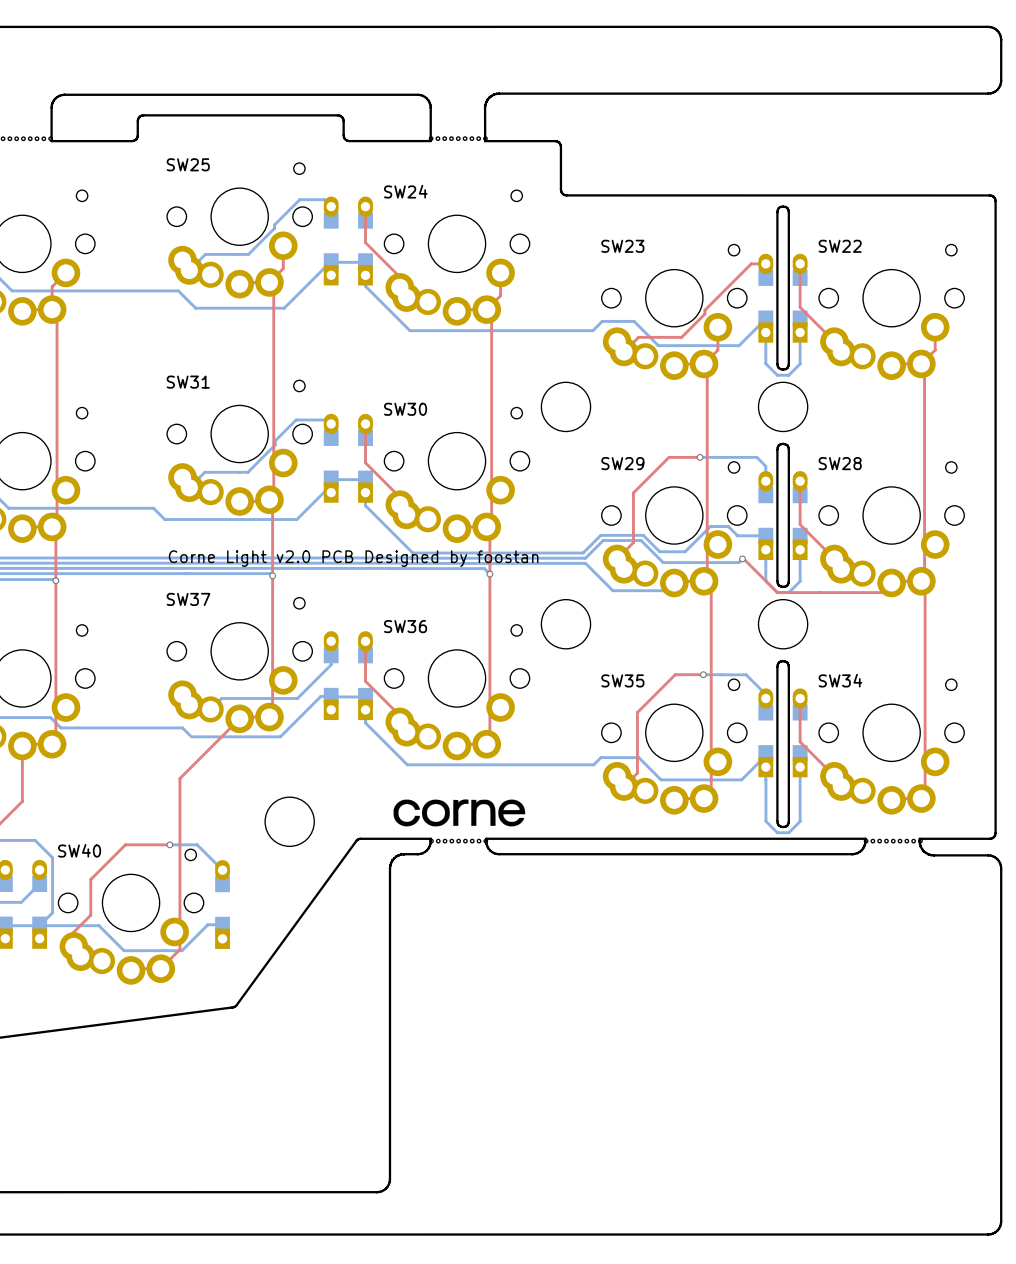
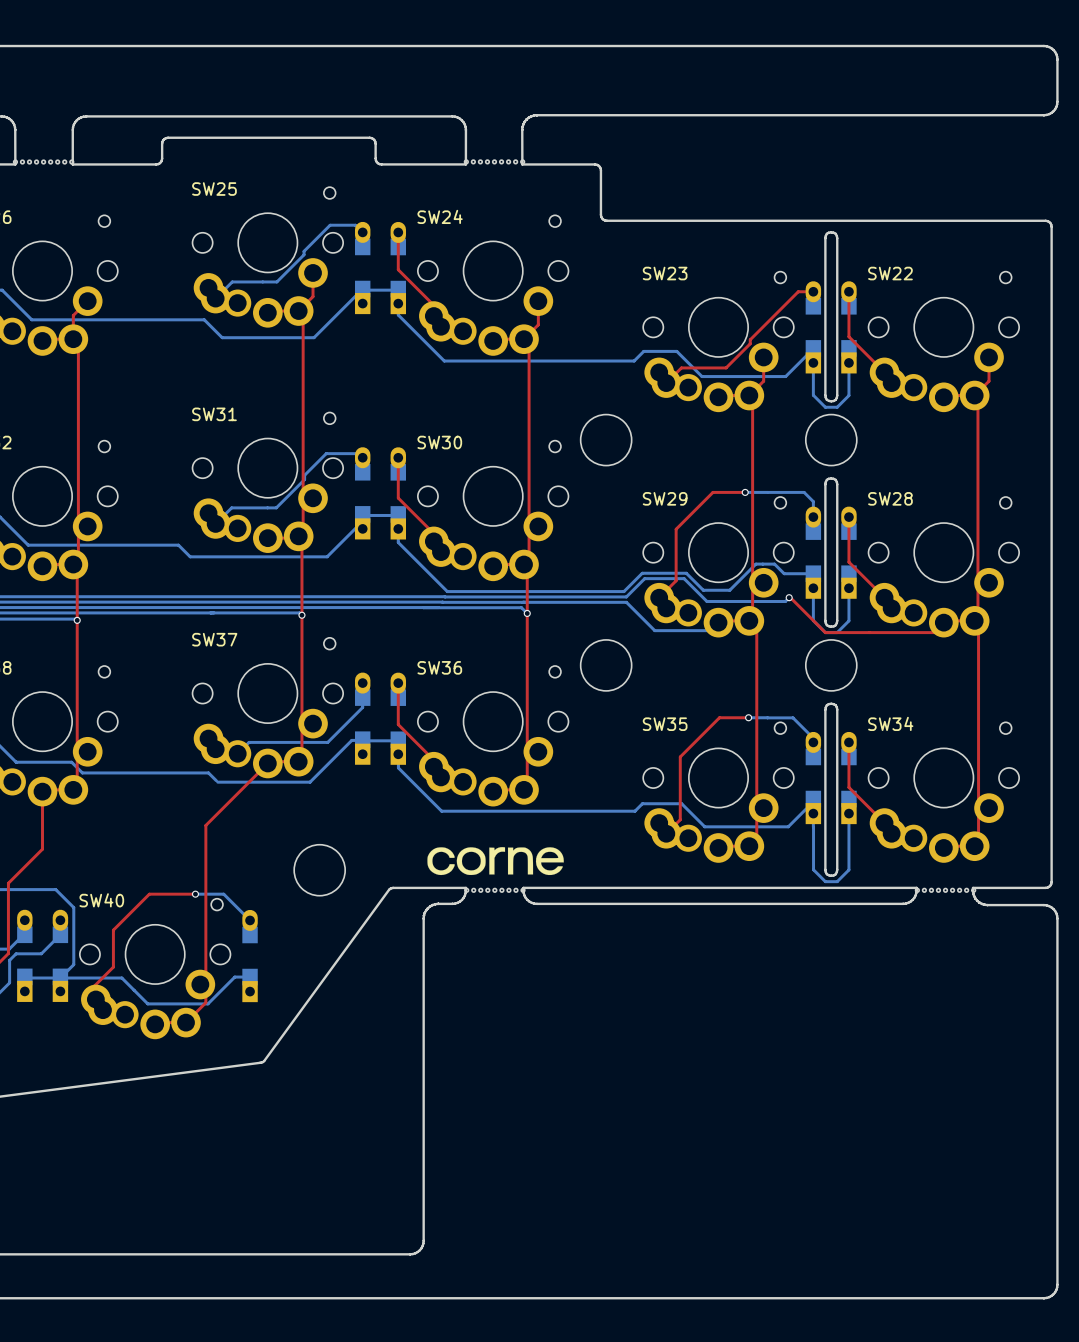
text: Corne Light v2.0 PCB Designed by foostan (353, 558) -> none

